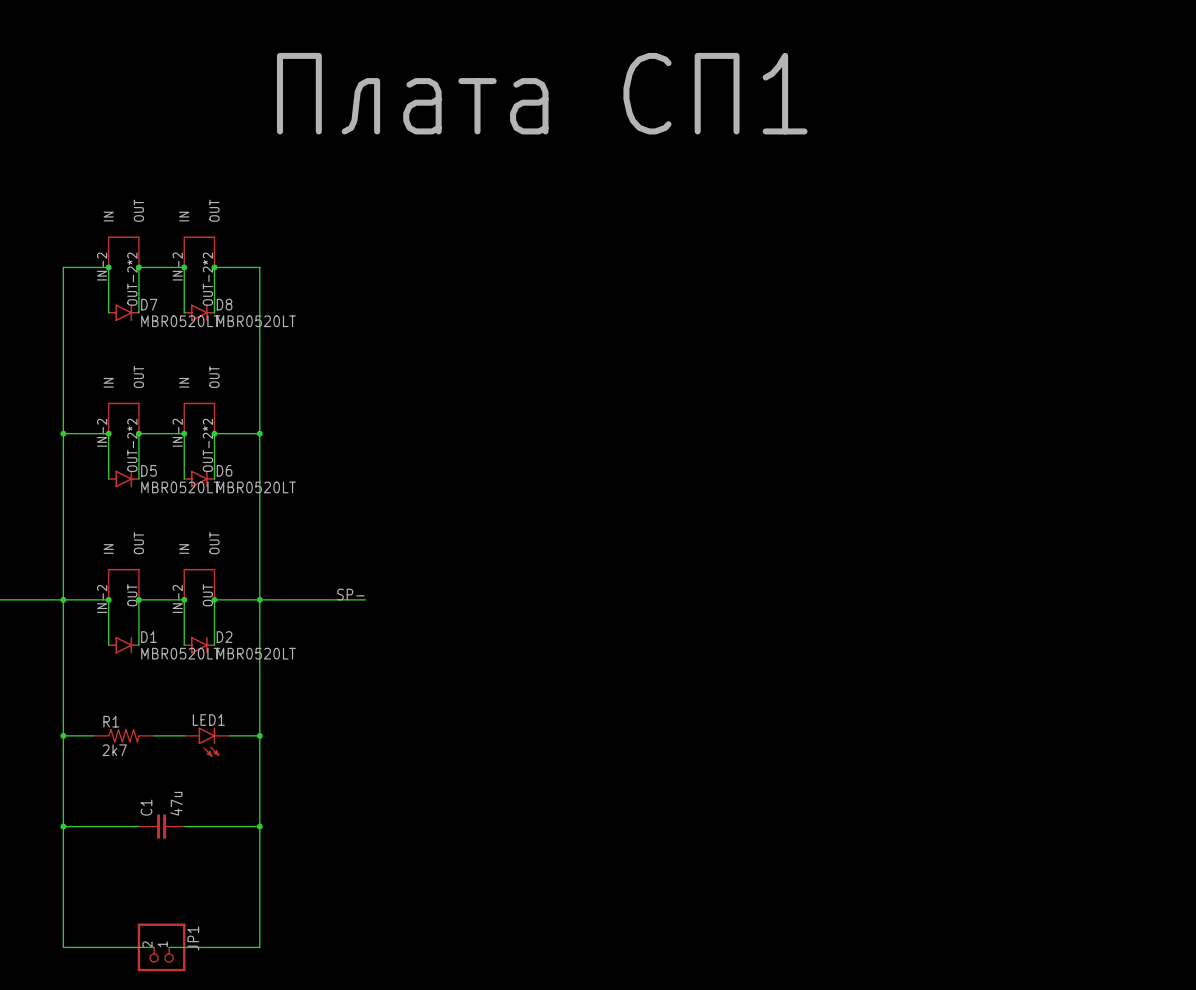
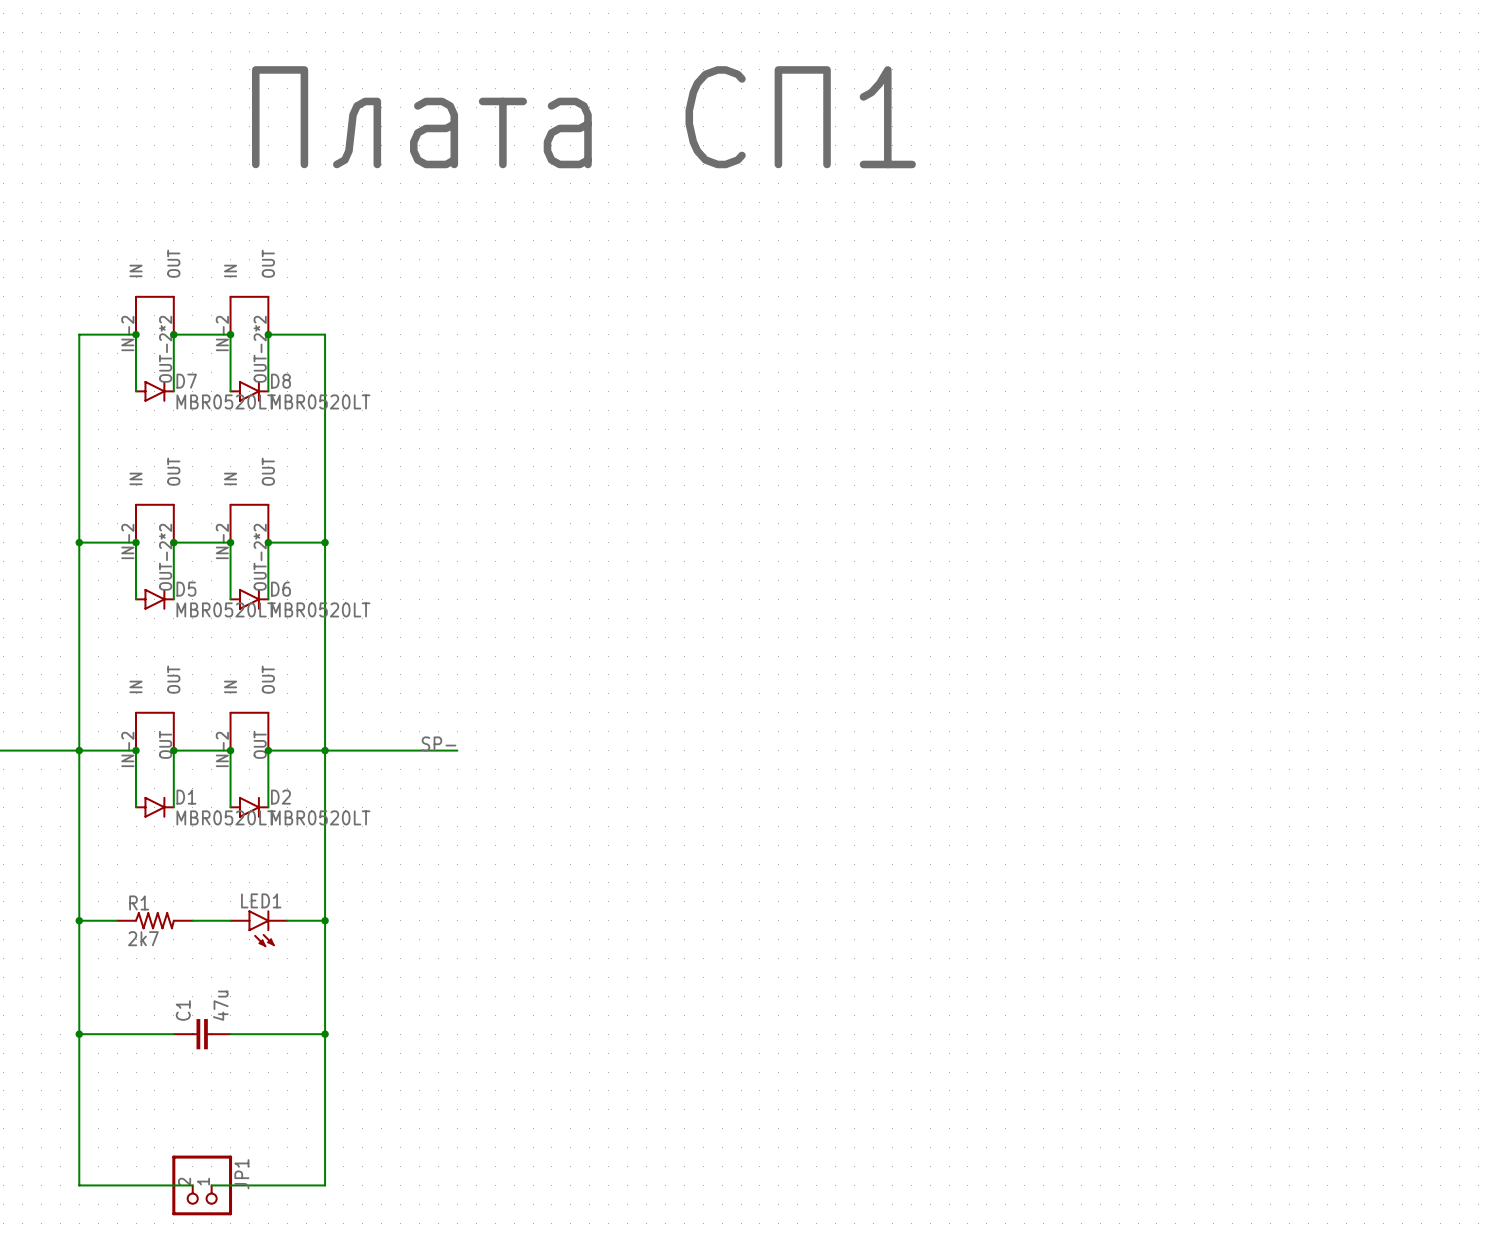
part position: (542, 93) -> (583, 117)

